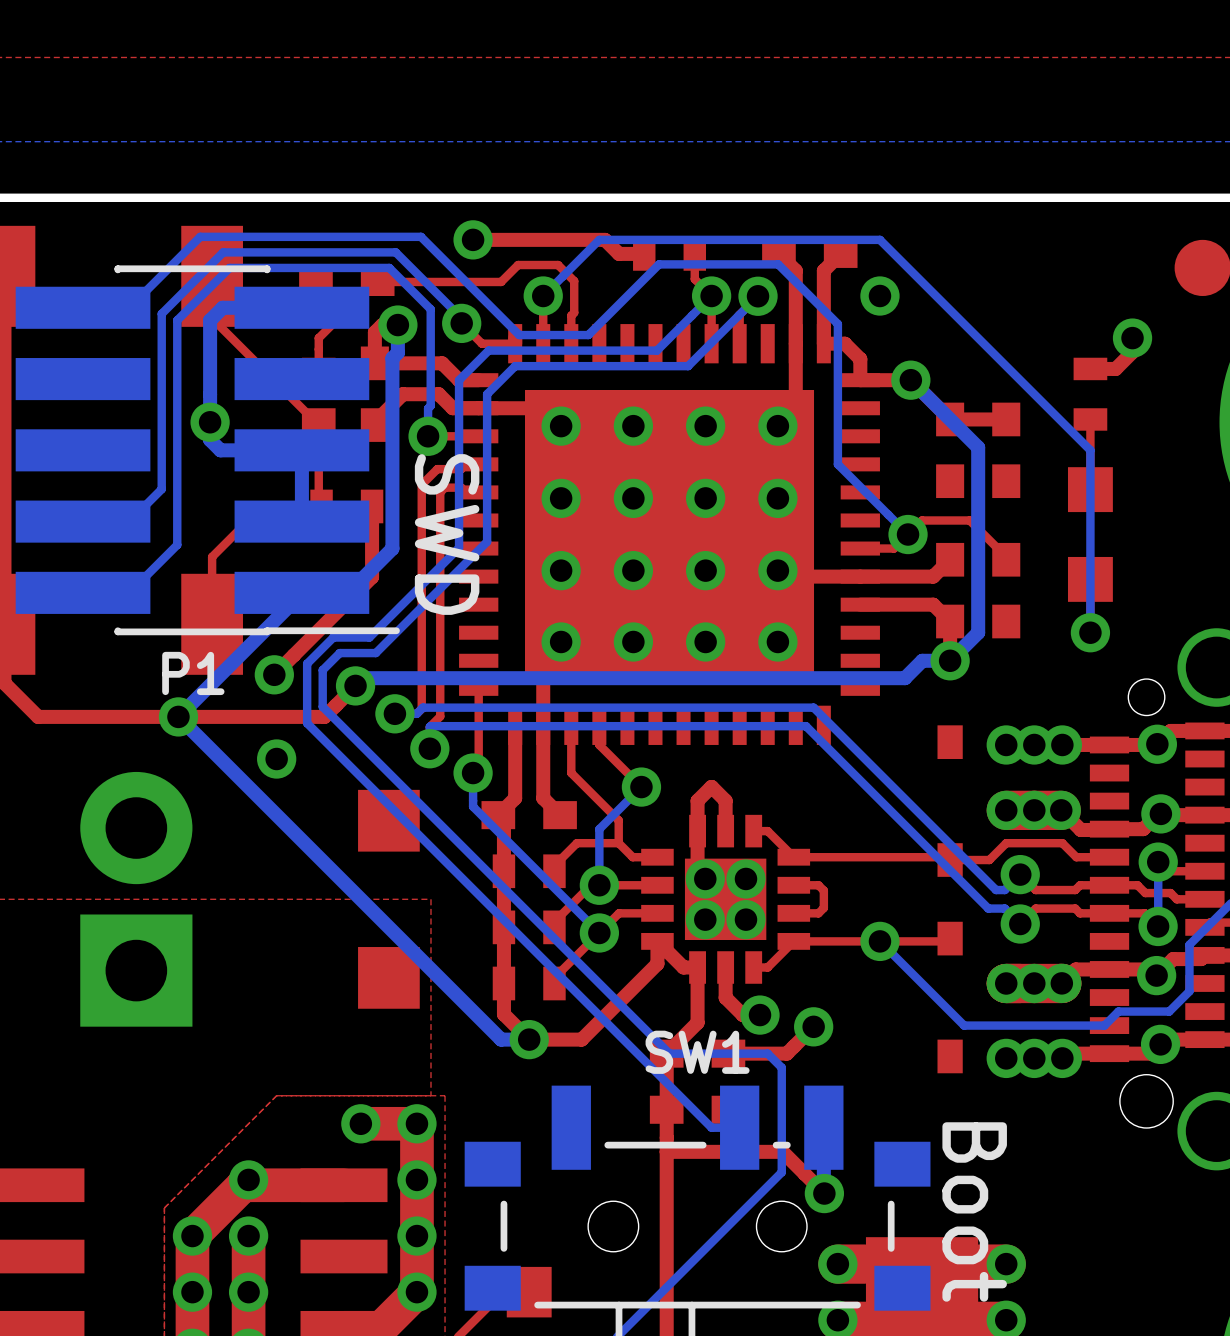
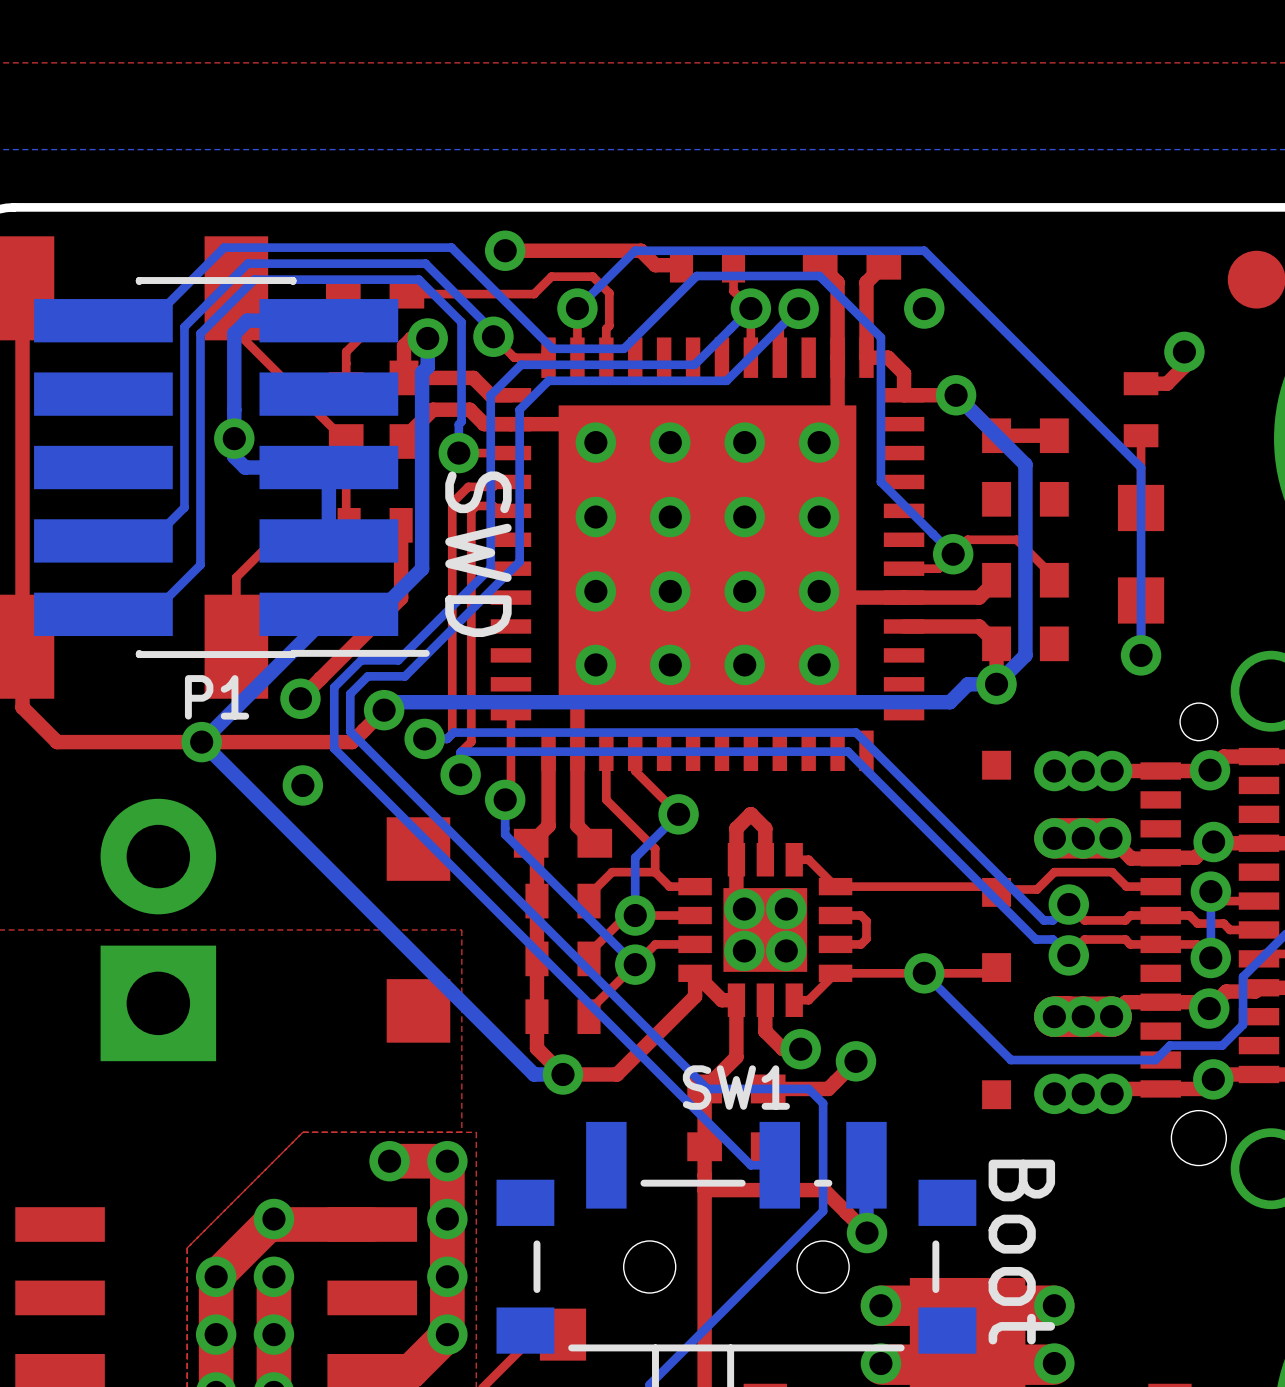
part footprint: [937, 725, 963, 877] -> [982, 750, 1011, 907]
part footprint: [937, 921, 963, 1074] -> [982, 953, 1011, 1110]

